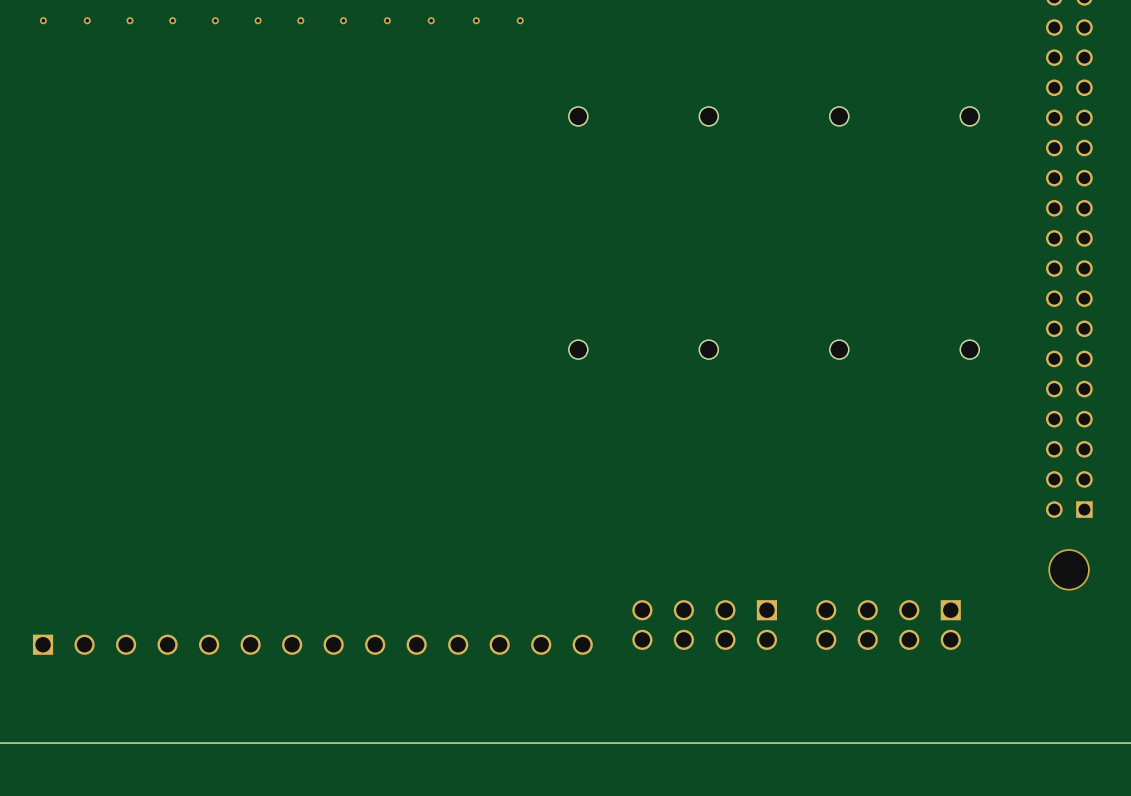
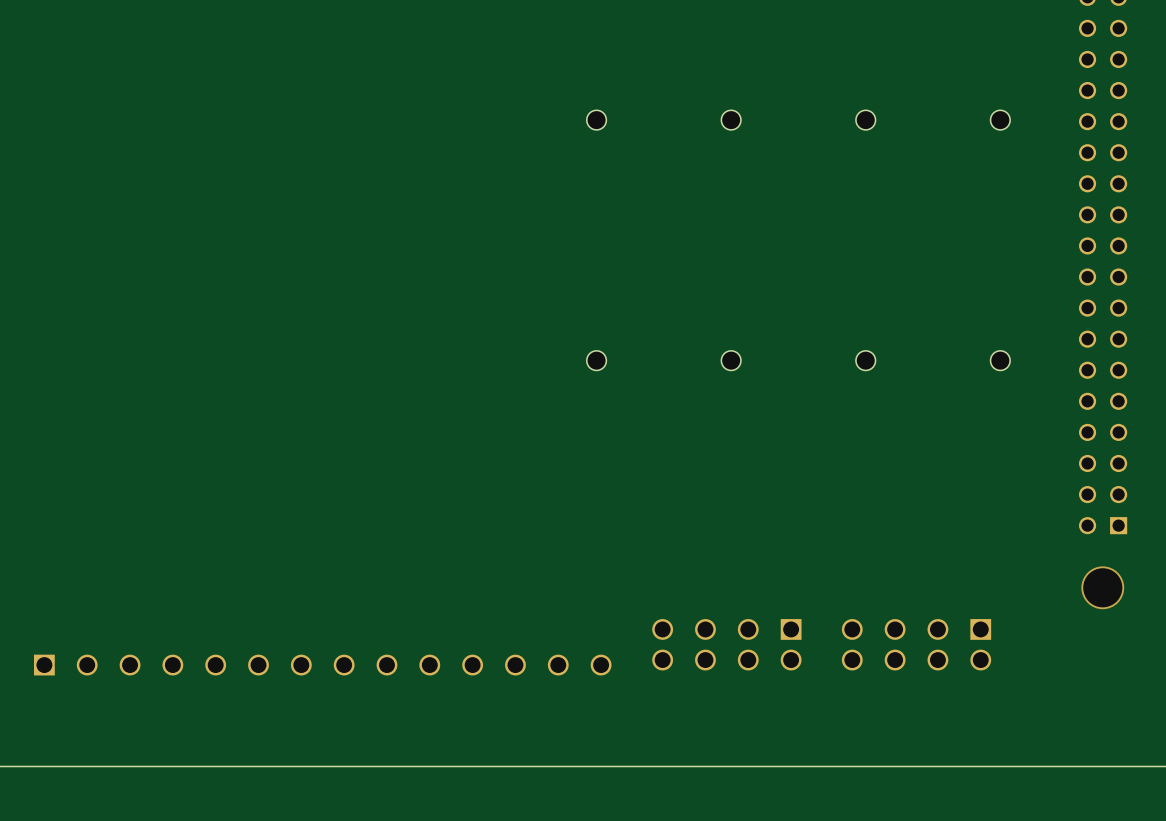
via: (43, 20) -> none
via: (87, 20) -> none
via: (129, 20) -> none
via: (172, 20) -> none
via: (215, 20) -> none
via: (258, 20) -> none
via: (300, 20) -> none
via: (343, 20) -> none
via: (387, 20) -> none
via: (431, 20) -> none
via: (476, 20) -> none
via: (520, 20) -> none

